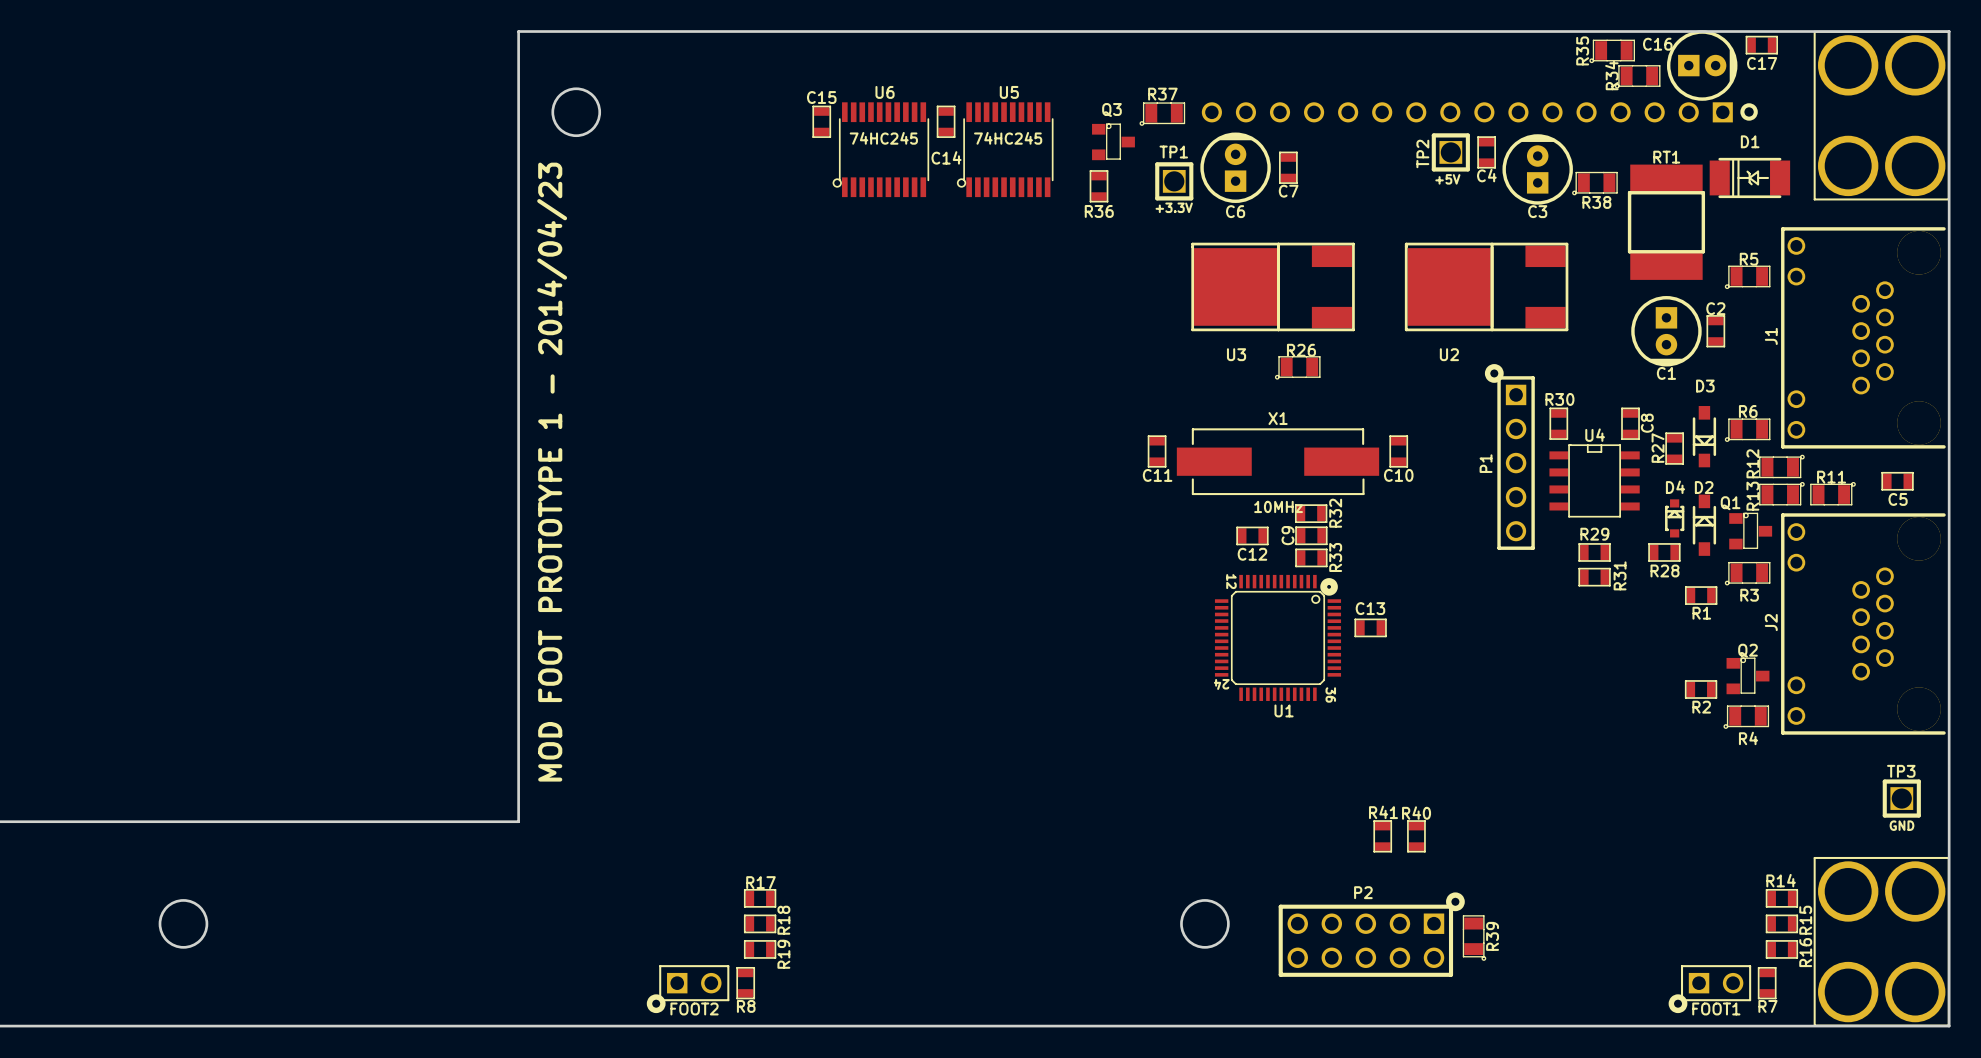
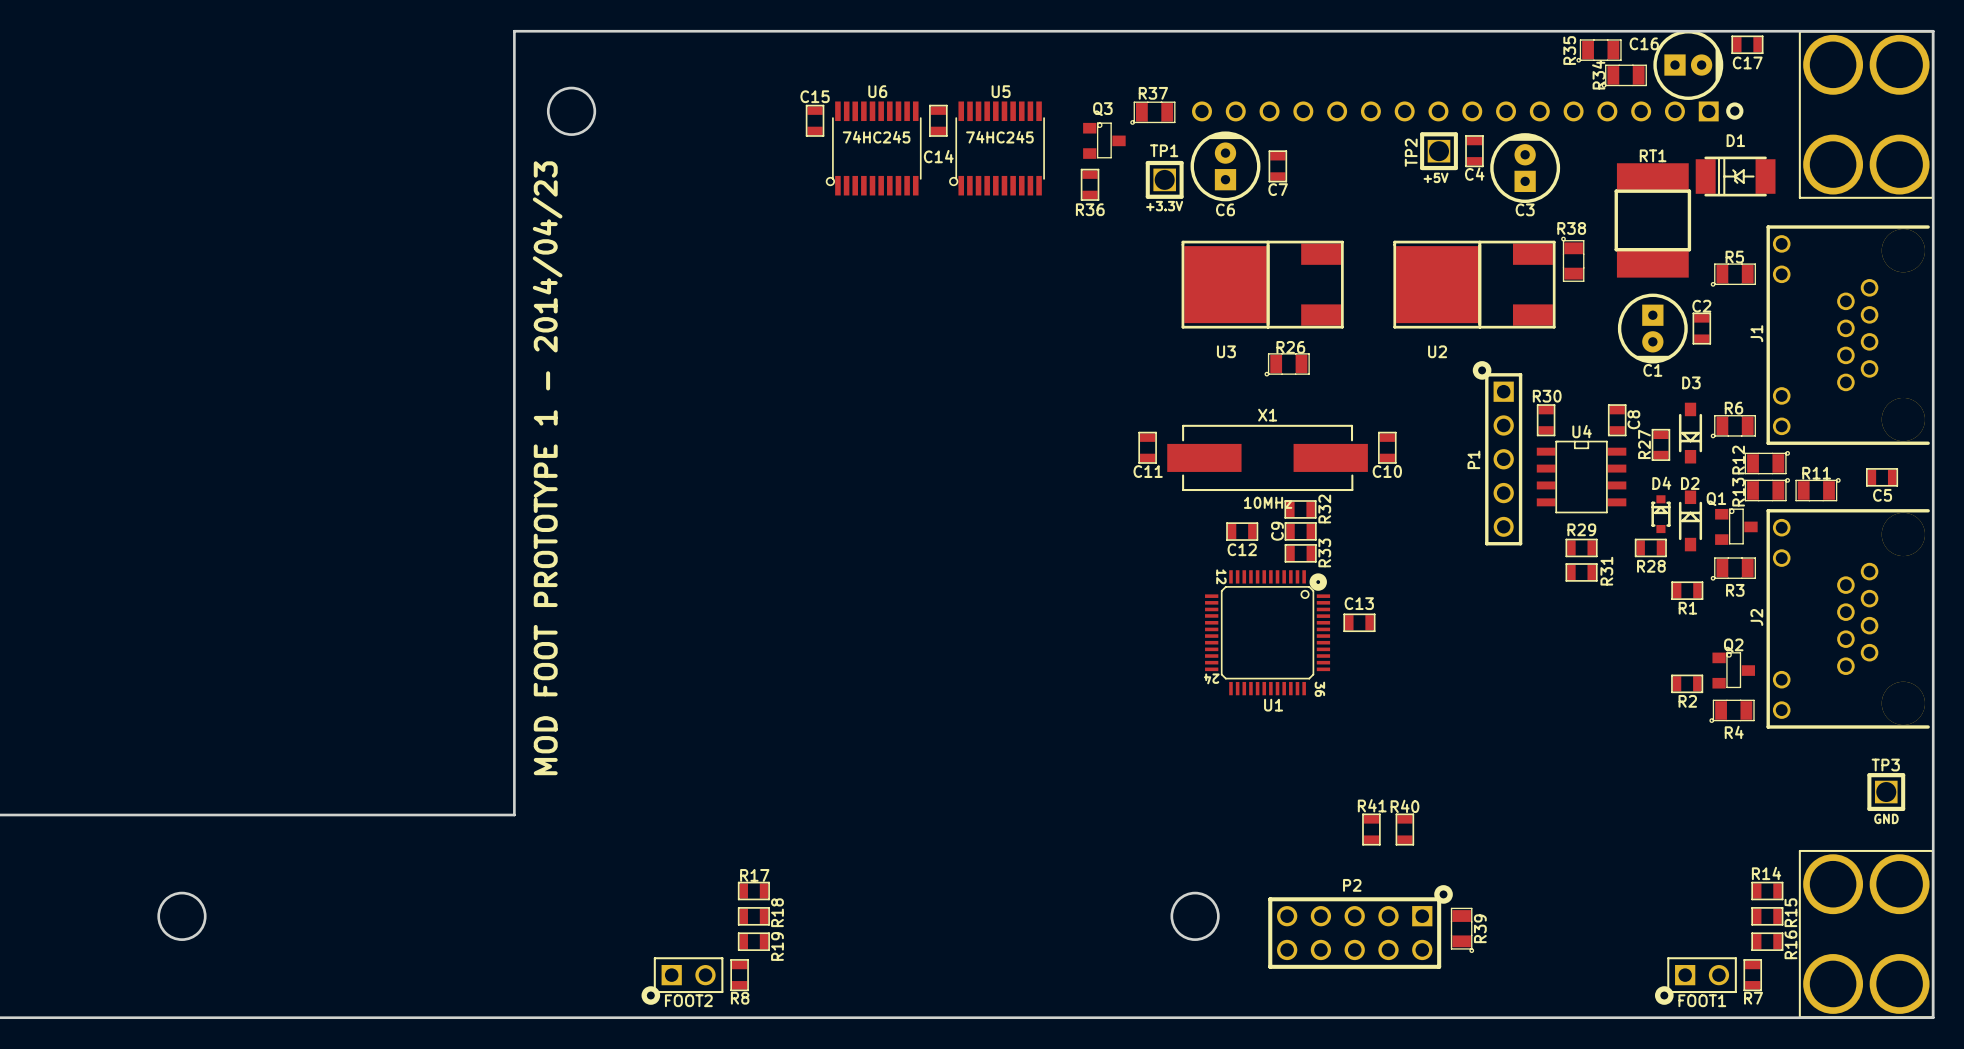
R38 rotation: 0° (1594, 183) -> 90° clockwise (1572, 259)
R38 position: (1594, 183) -> (1572, 259)
R38 name position: R38 (1596, 202) -> R38 (1571, 228)

